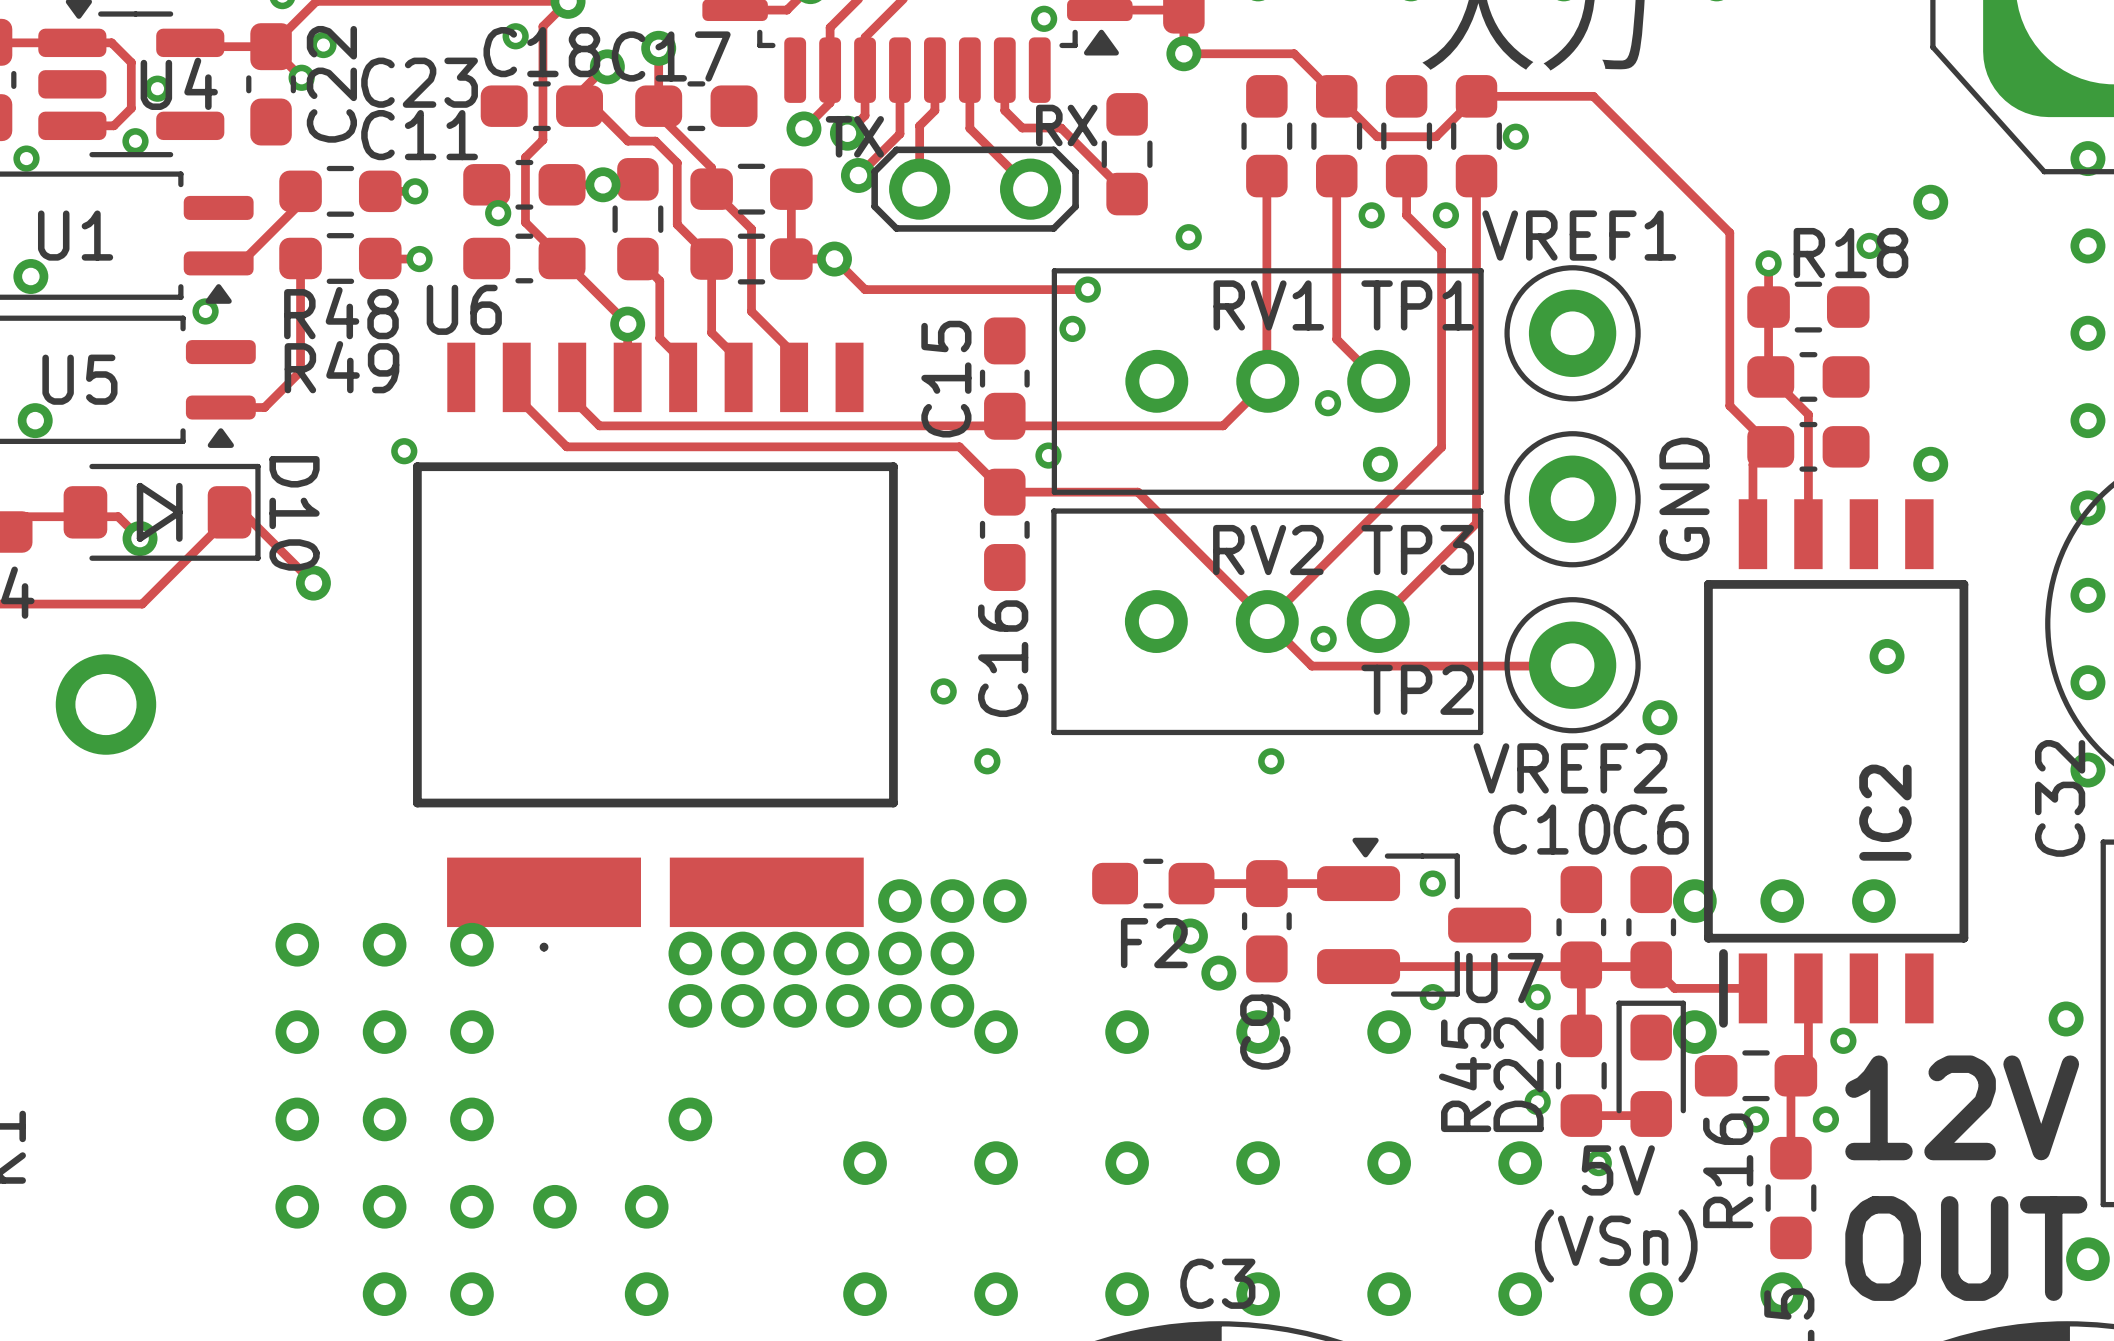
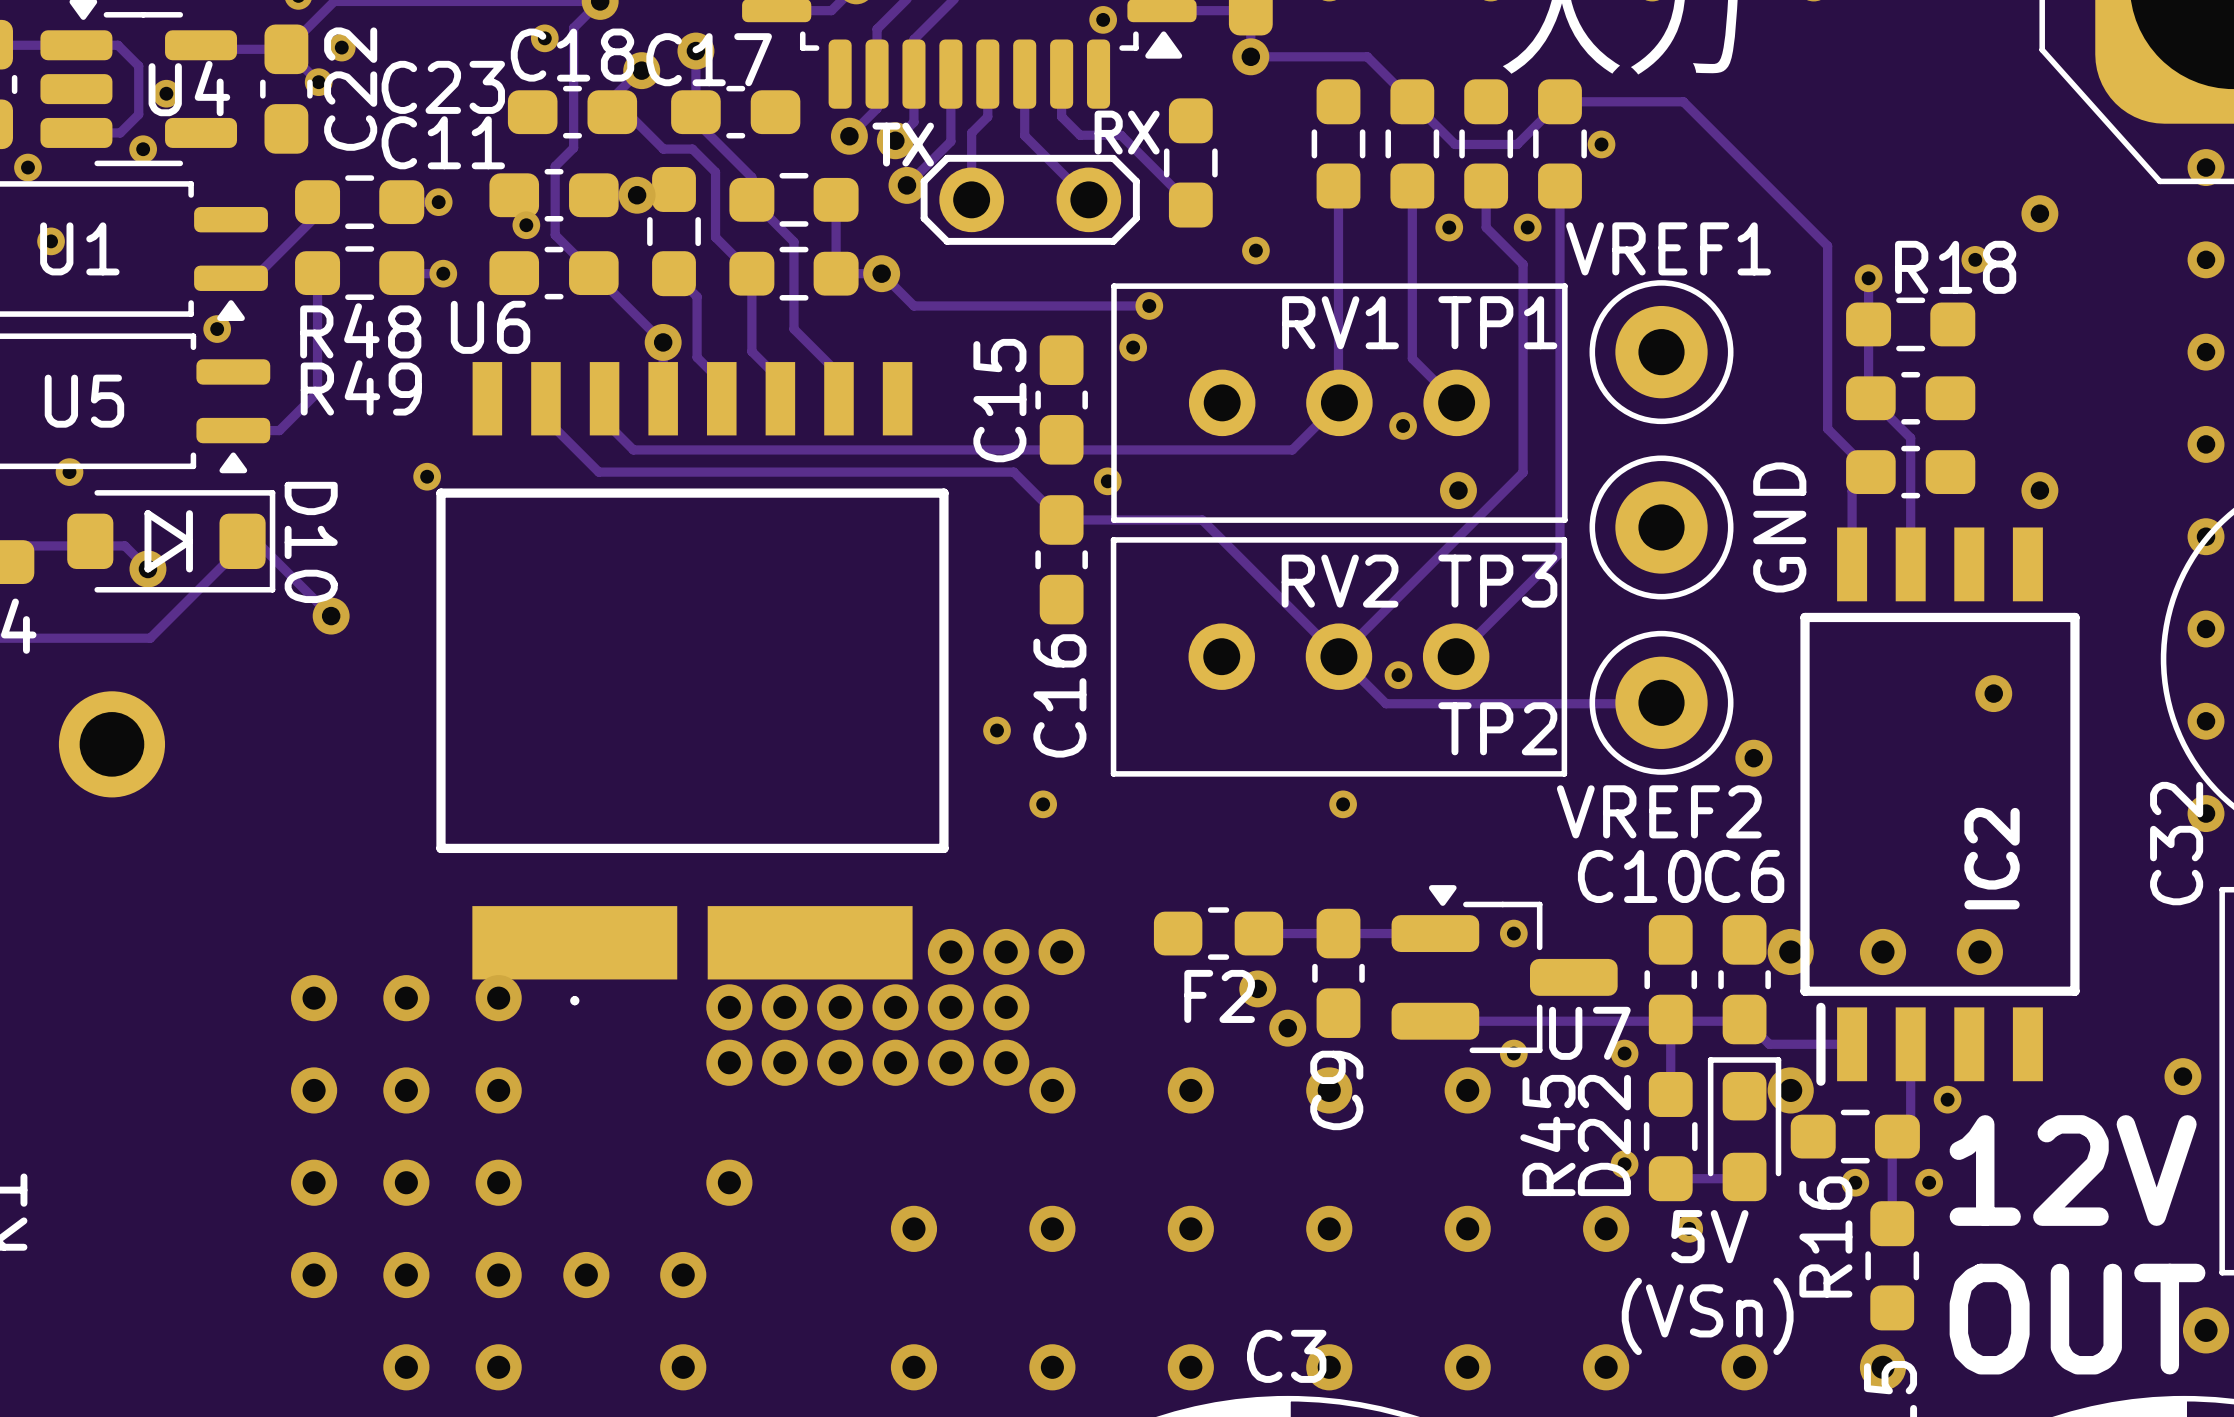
via: none -> (51, 241)
via: (30, 276) -> none
via: (35, 420) -> none
via: none -> (69, 472)

